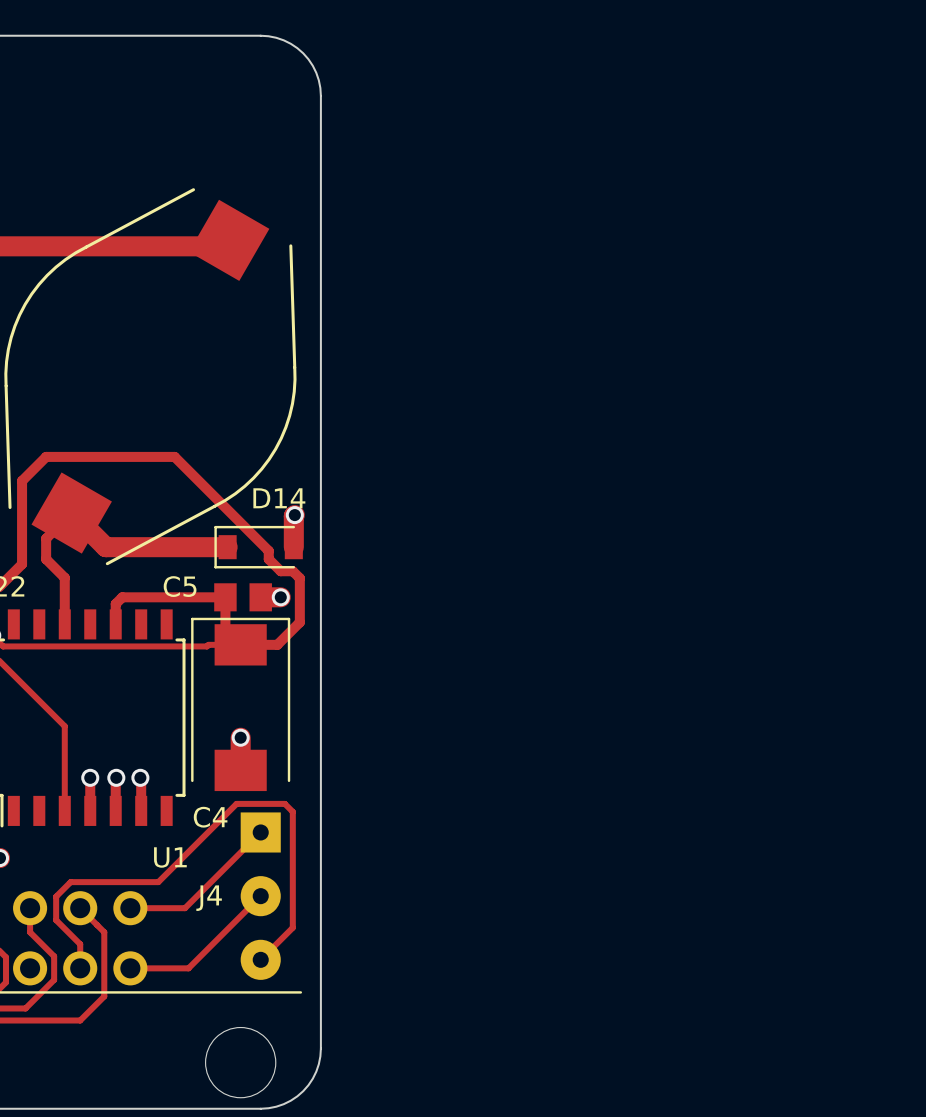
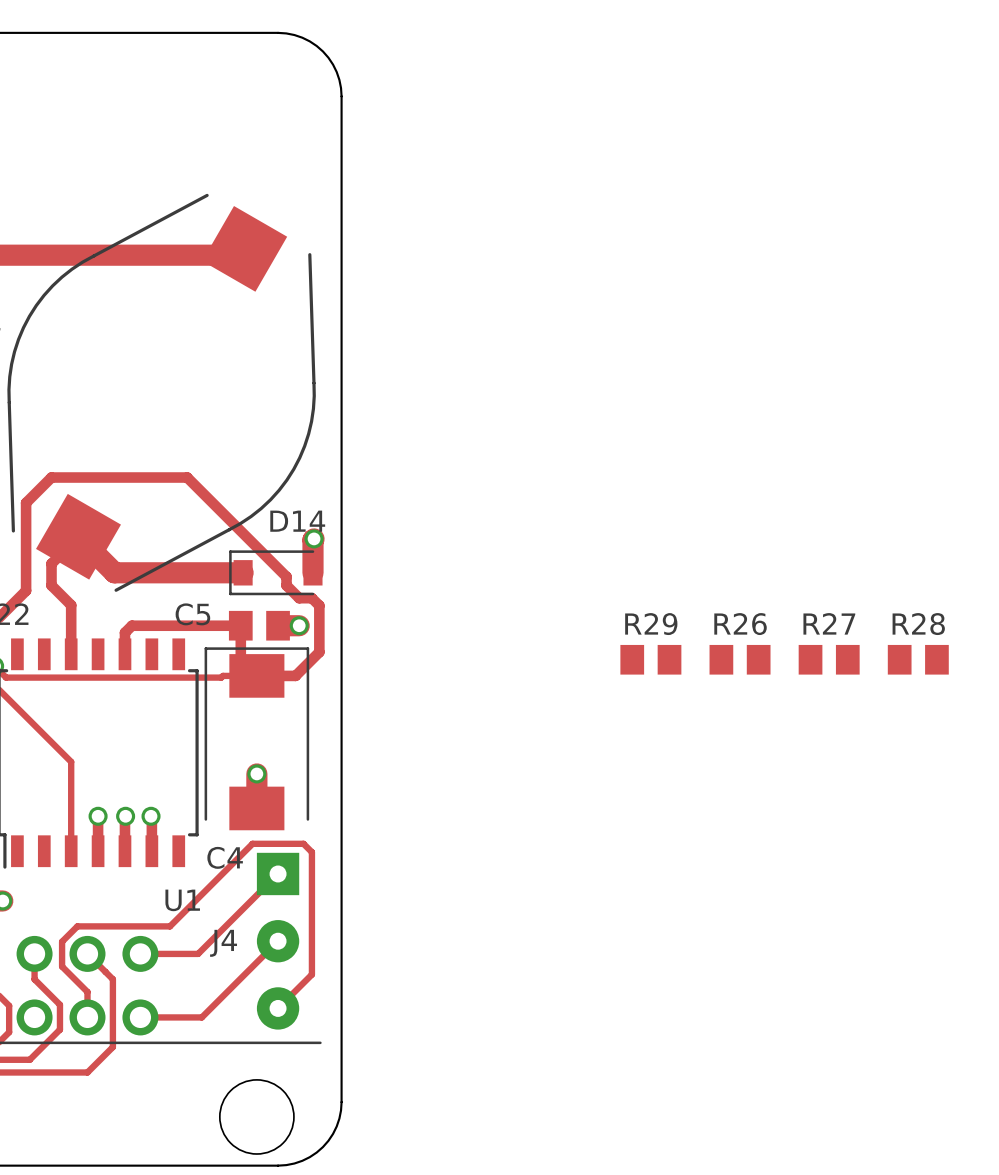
R29: none -> (650, 659)
R26: none -> (740, 659)
R27: none -> (829, 659)
R28: none -> (918, 659)

